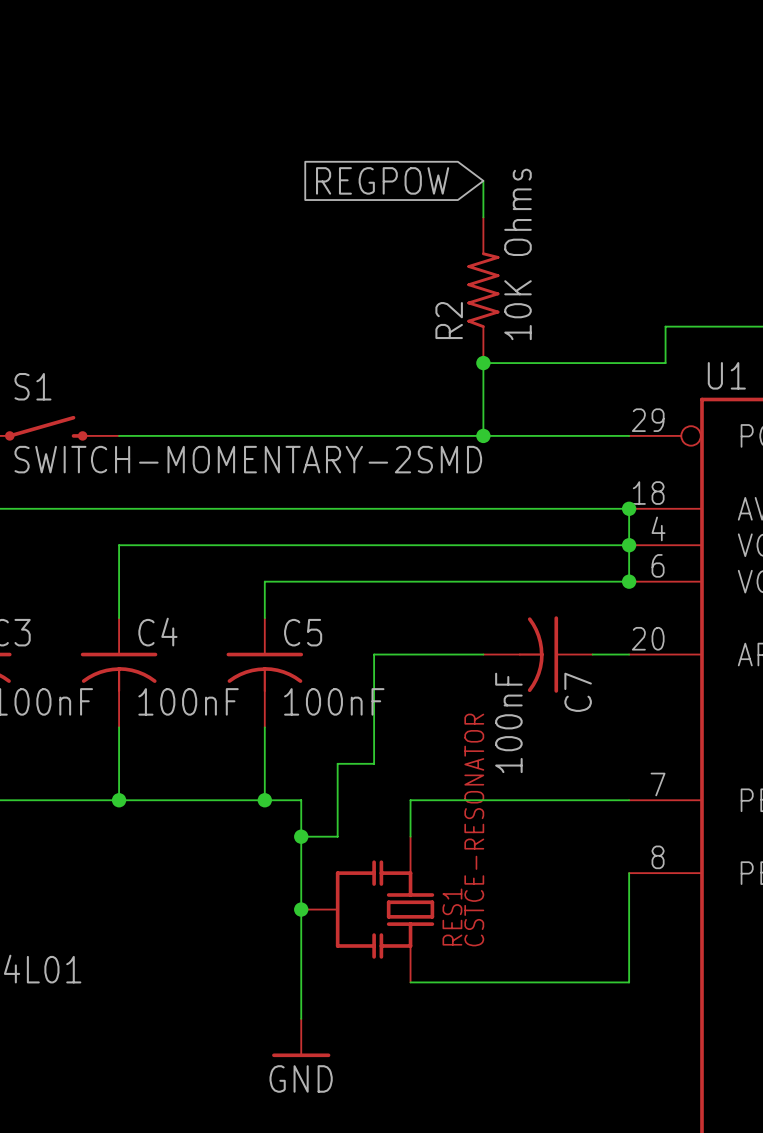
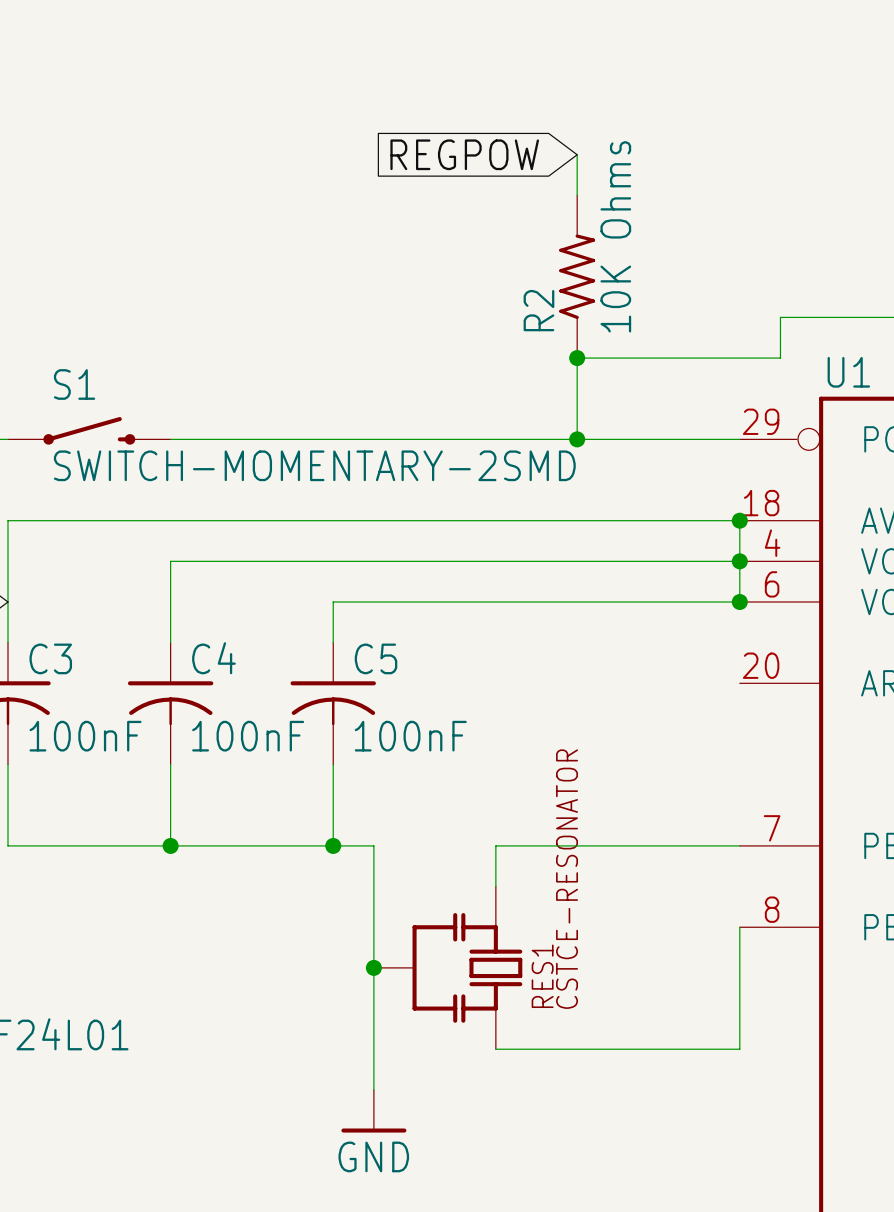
wire: (483, 654) (374, 654) (374, 763) (337, 763) (337, 836) (301, 836) -> none
C7: 100nF (538, 654) -> none
wire: (592, 654) (629, 654) -> none
junction: (301, 836) -> none

